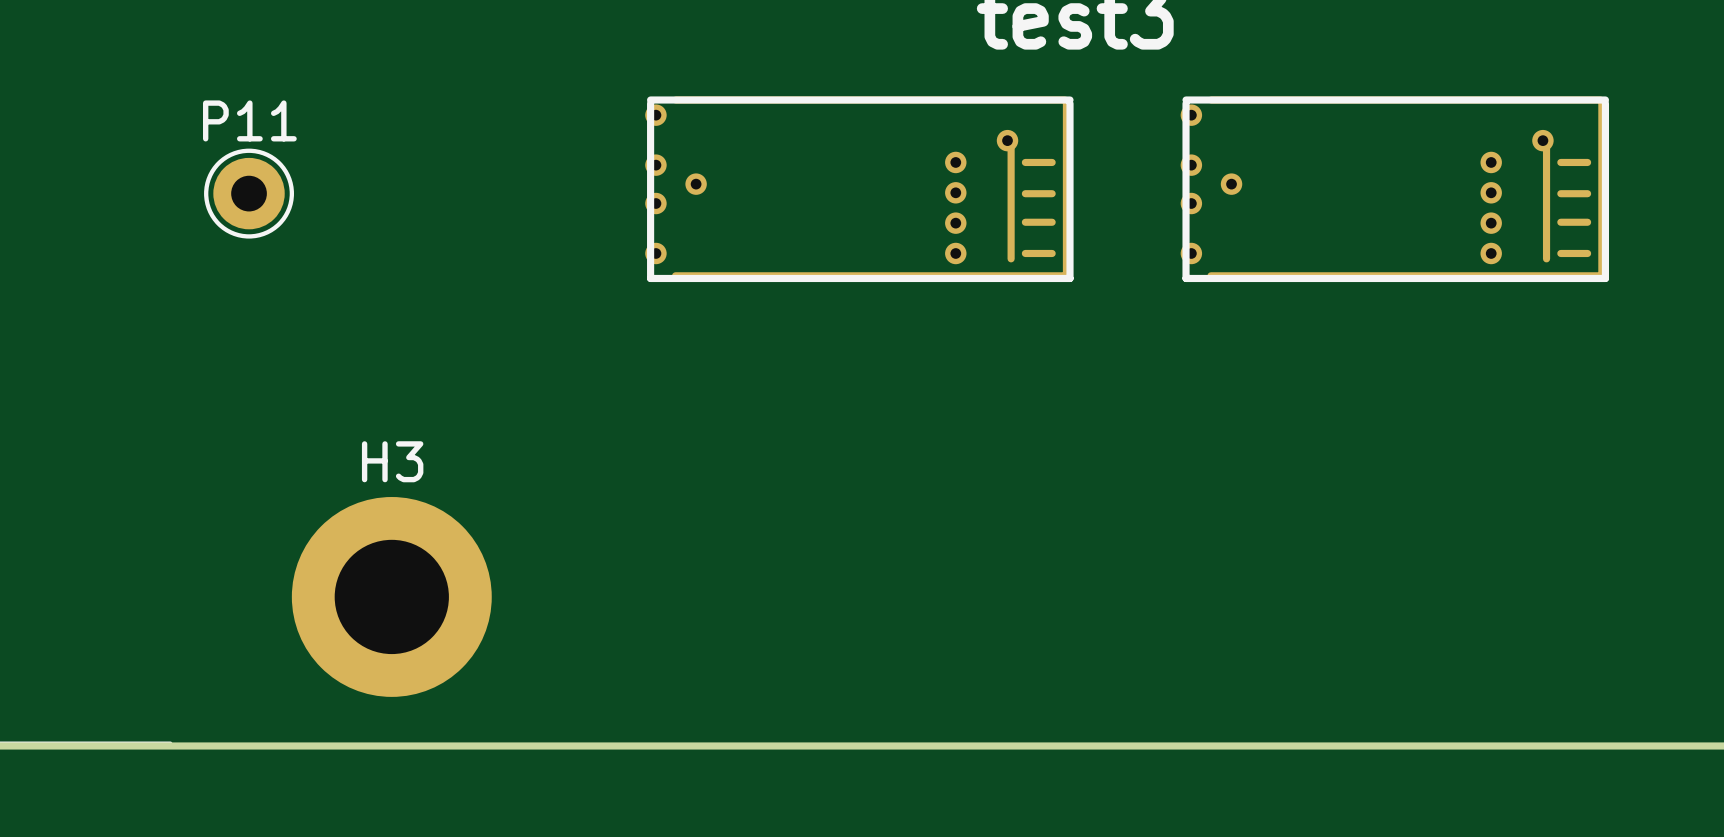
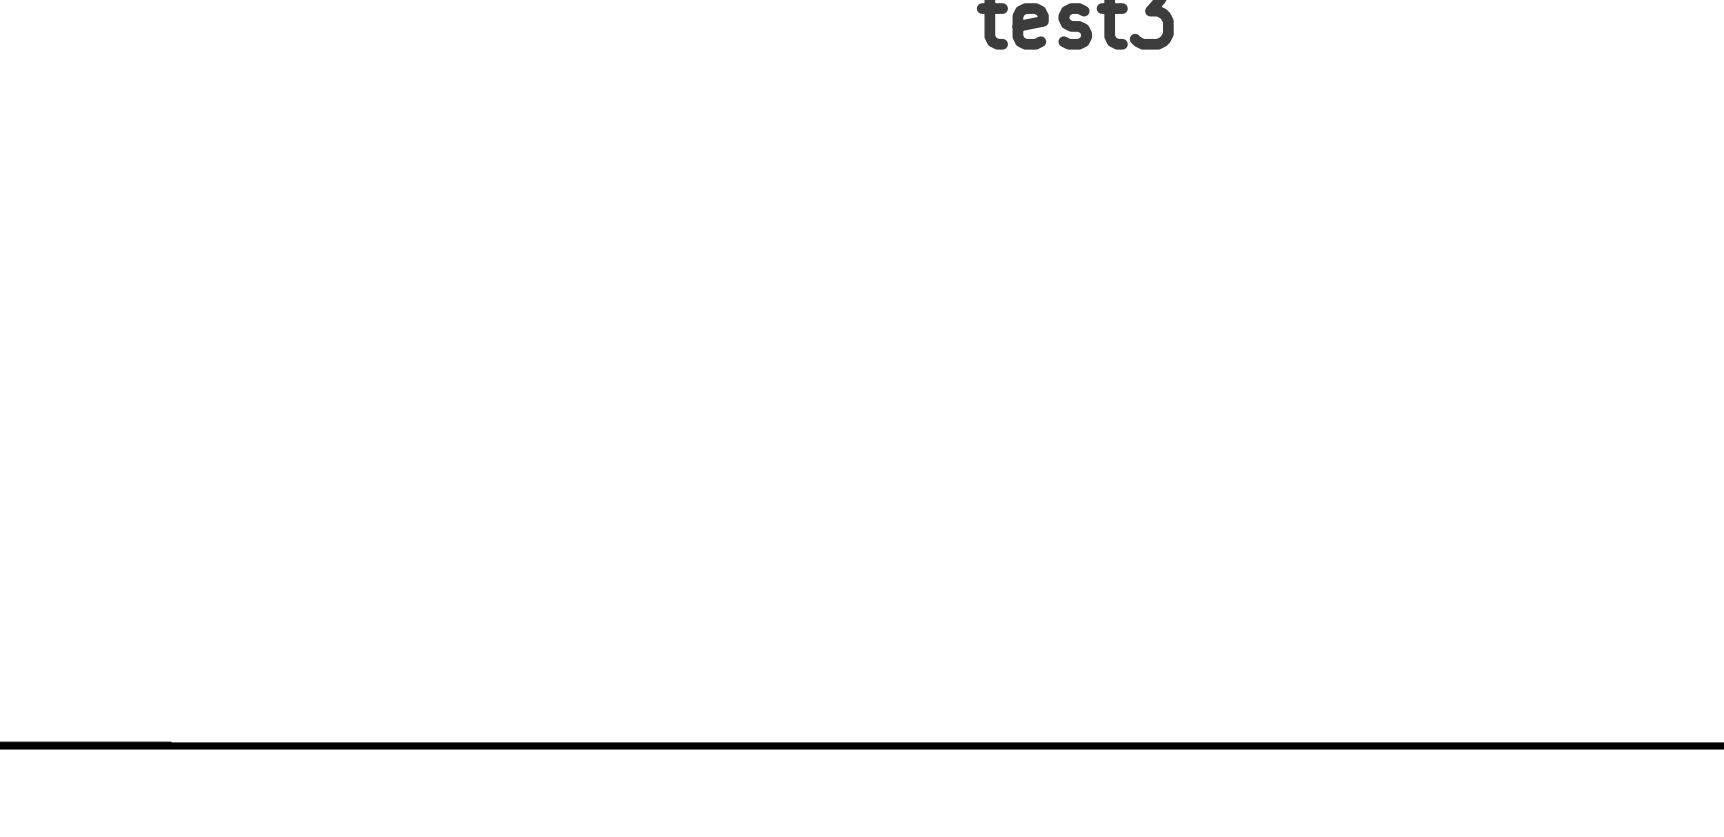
part: (859, 189) -> none
part: (1394, 189) -> none
P11: (249, 193) -> none
H3: (391, 596) -> none

